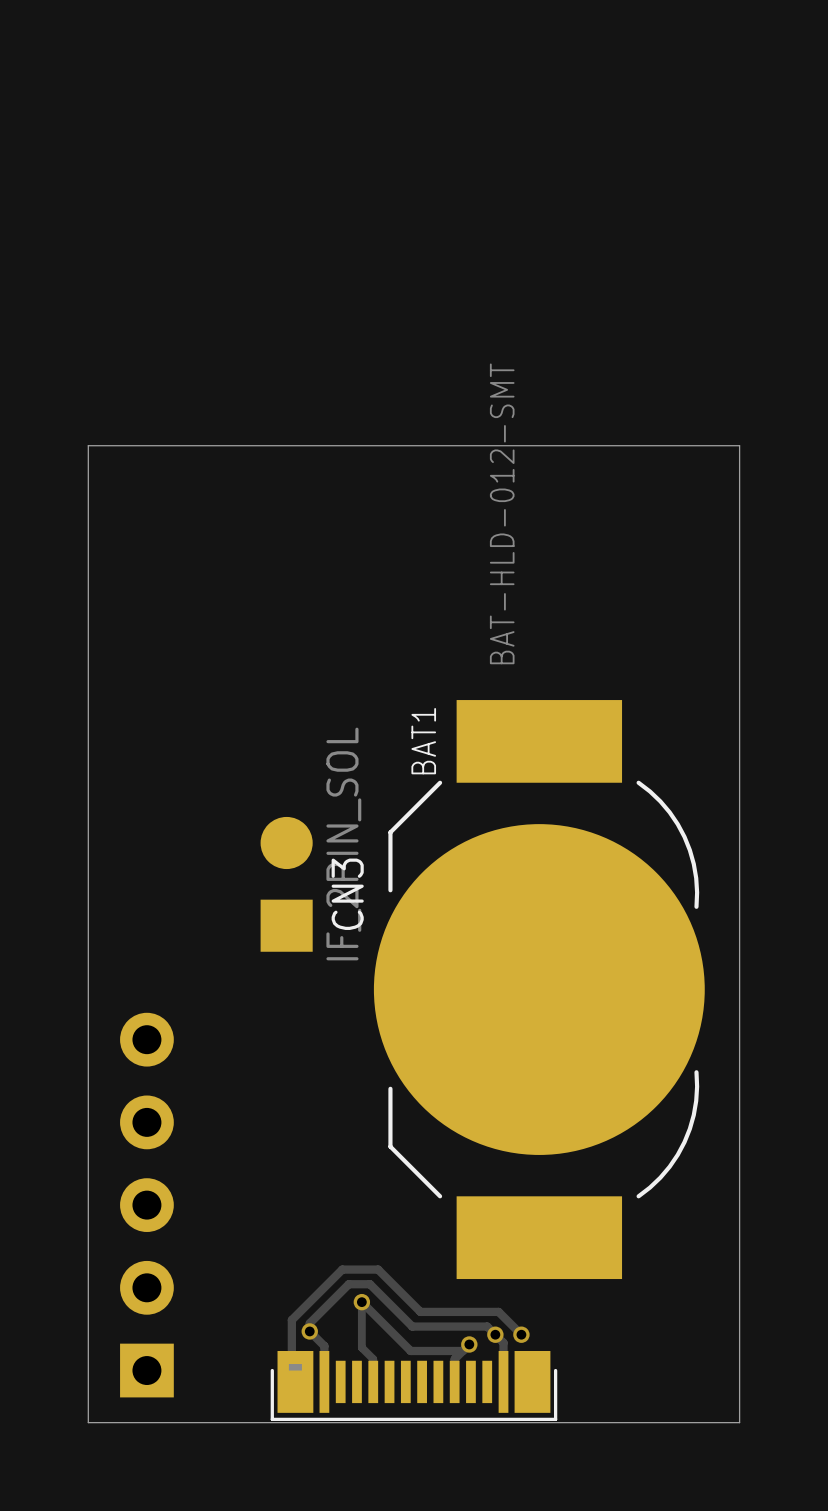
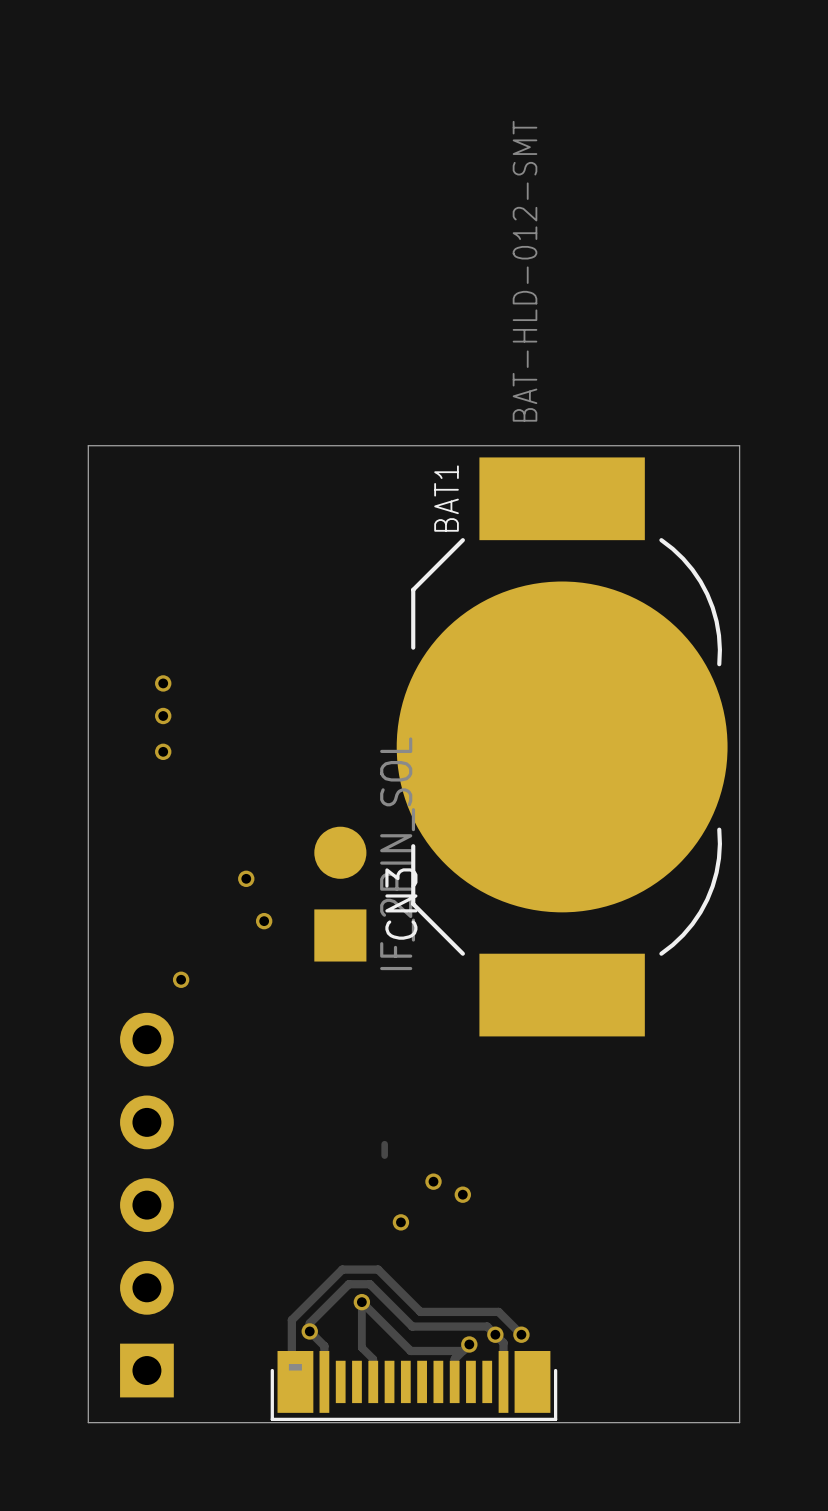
via: none -> (163, 683)
via: none -> (163, 715)
via: none -> (163, 751)
via: none -> (246, 878)
CN3 position: (286, 884) -> (340, 894)
via: none -> (264, 921)
via: none -> (181, 979)
BAT1 position: (539, 989) -> (562, 746)
track: none -> (384, 1144) (384, 1155)
via: none -> (433, 1181)
via: none -> (462, 1194)
via: none -> (400, 1222)

